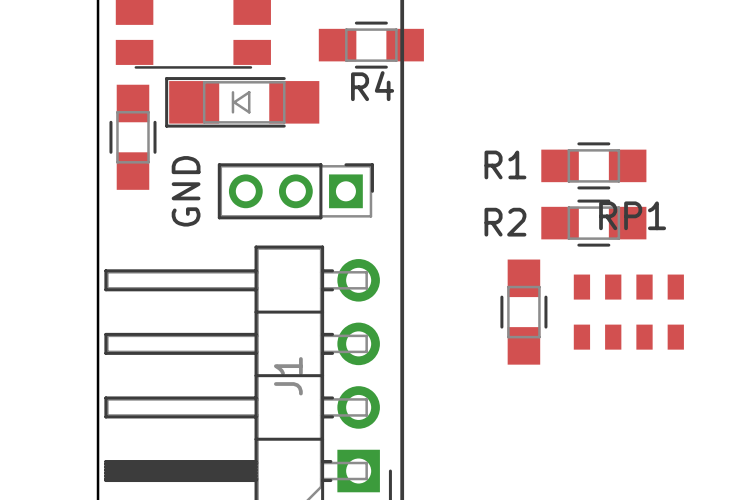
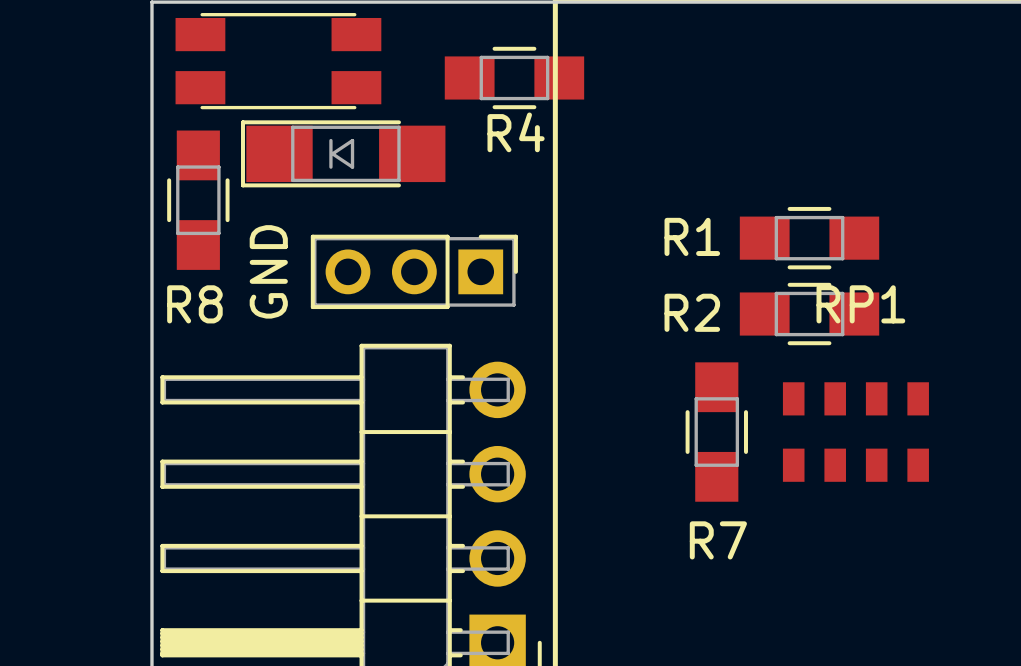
R8 name: none -> R8 (194, 304)
J1 name: J1 (288, 376) -> none
R7 name: none -> R7 (718, 540)

